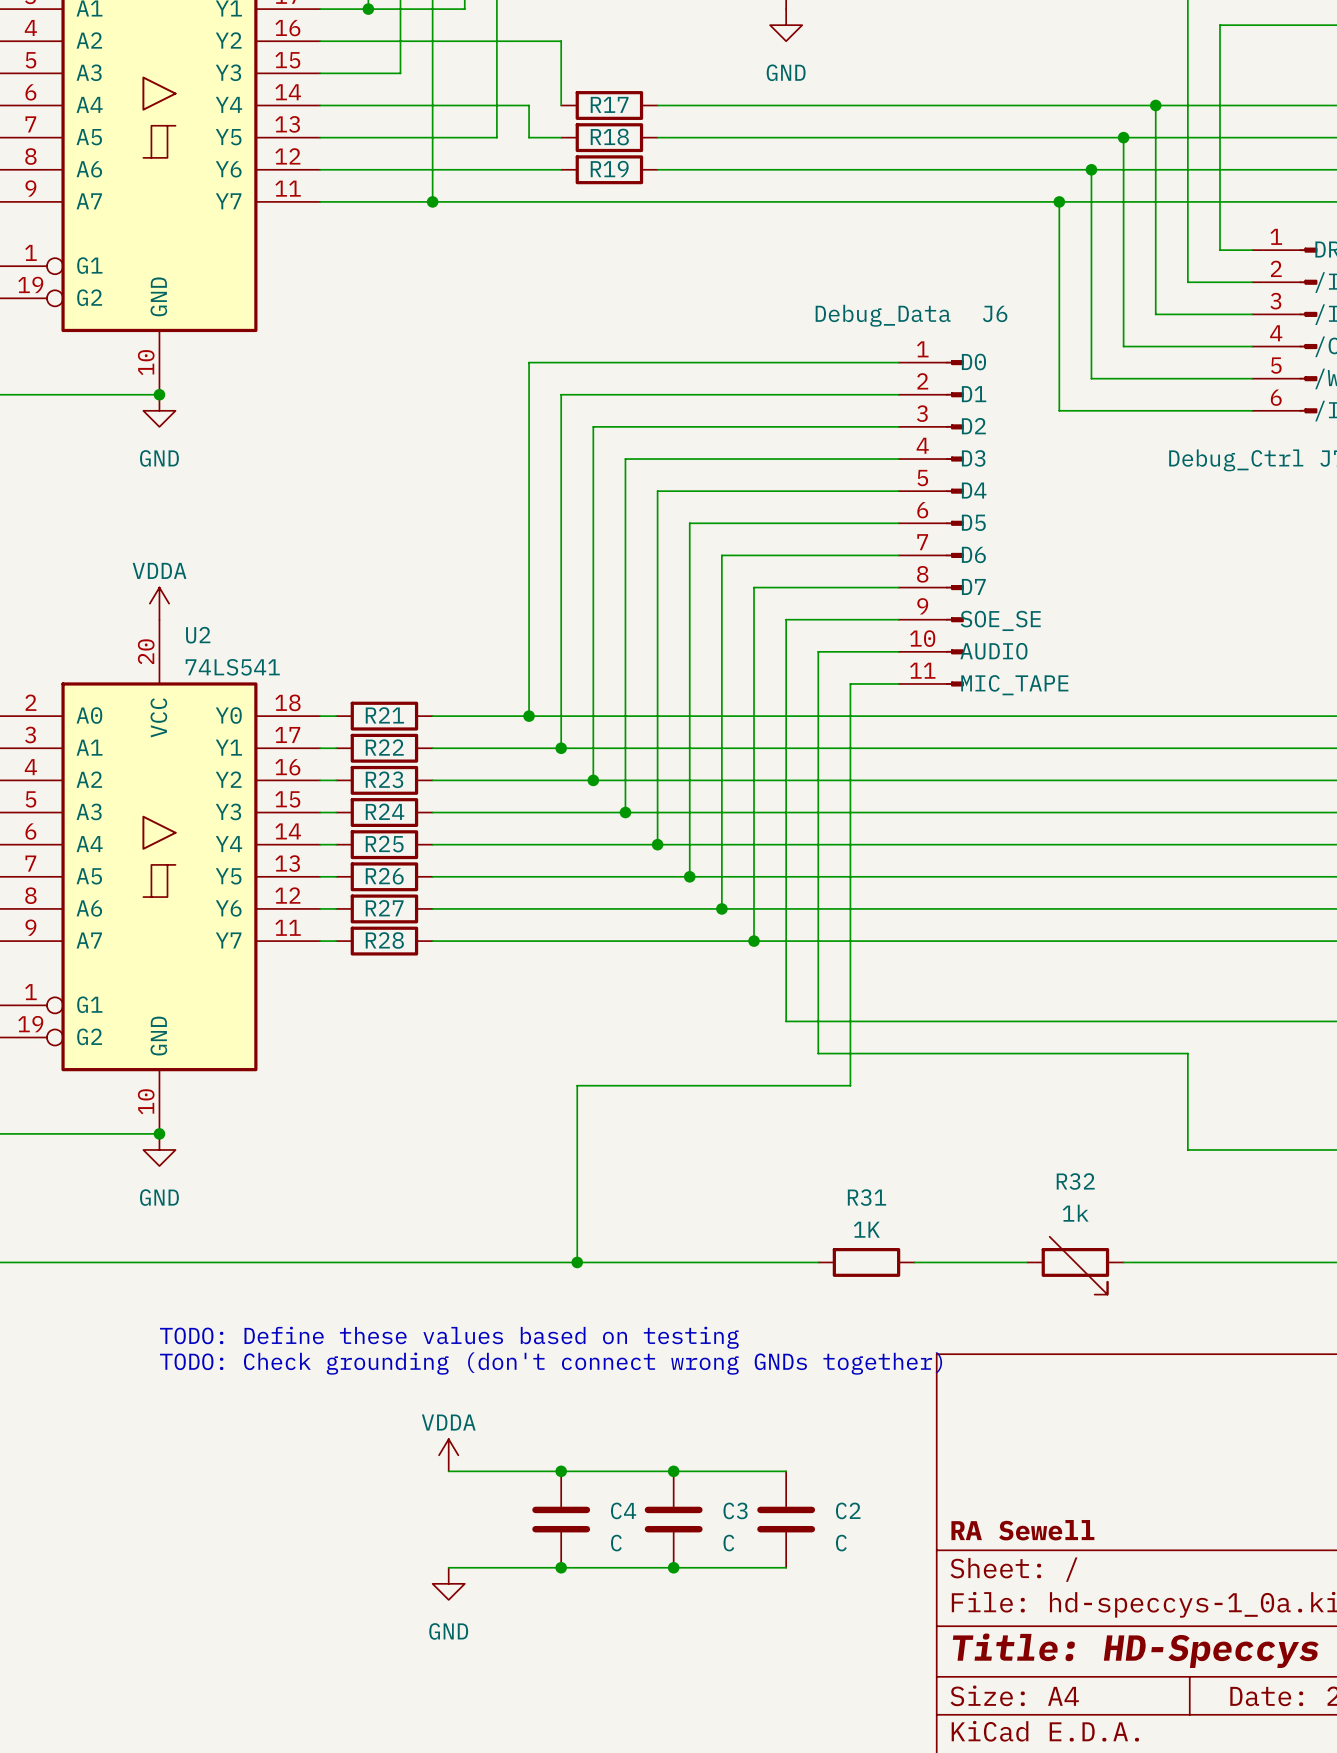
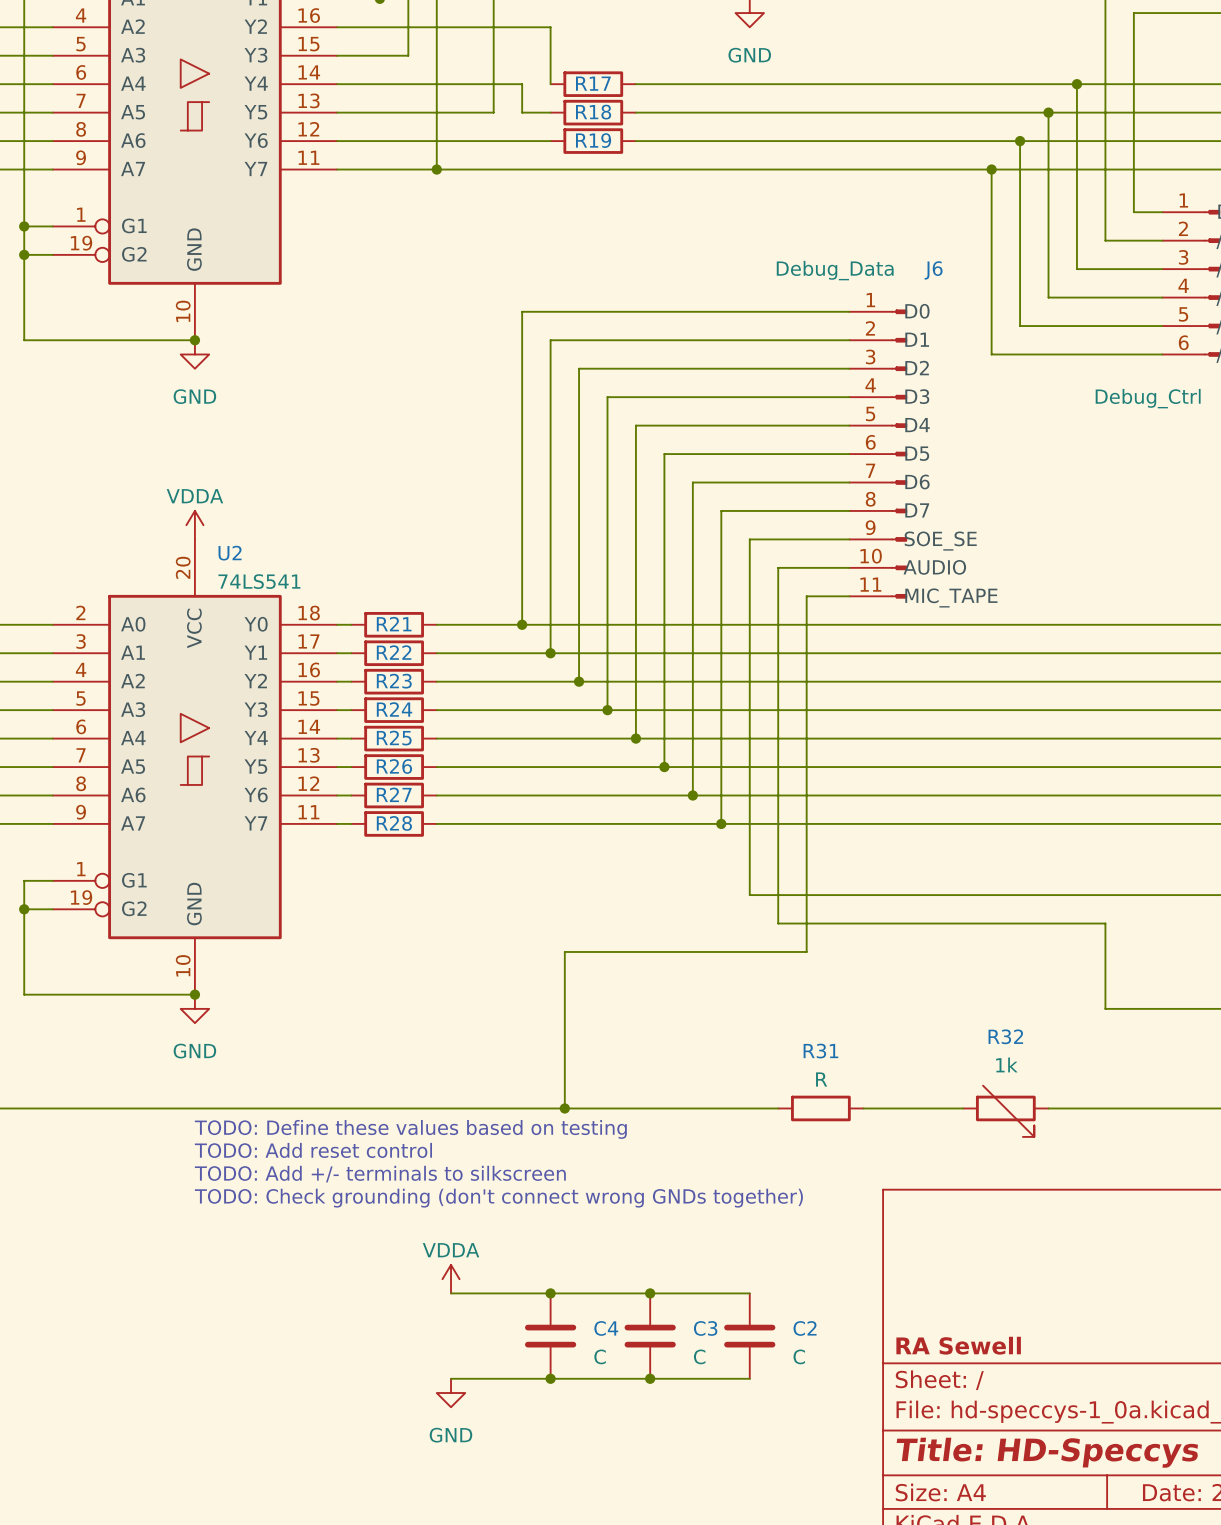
R31 value: 1K (866, 1229) -> R (821, 1079)
text: none -> TODO: Define these values based on testing (410, 1129)
text: none -> TODO: Add reset control (313, 1150)
text: TODO: Define these values based on testing (449, 1337) -> TODO: Add +/- terminals to silkscreen (380, 1174)

